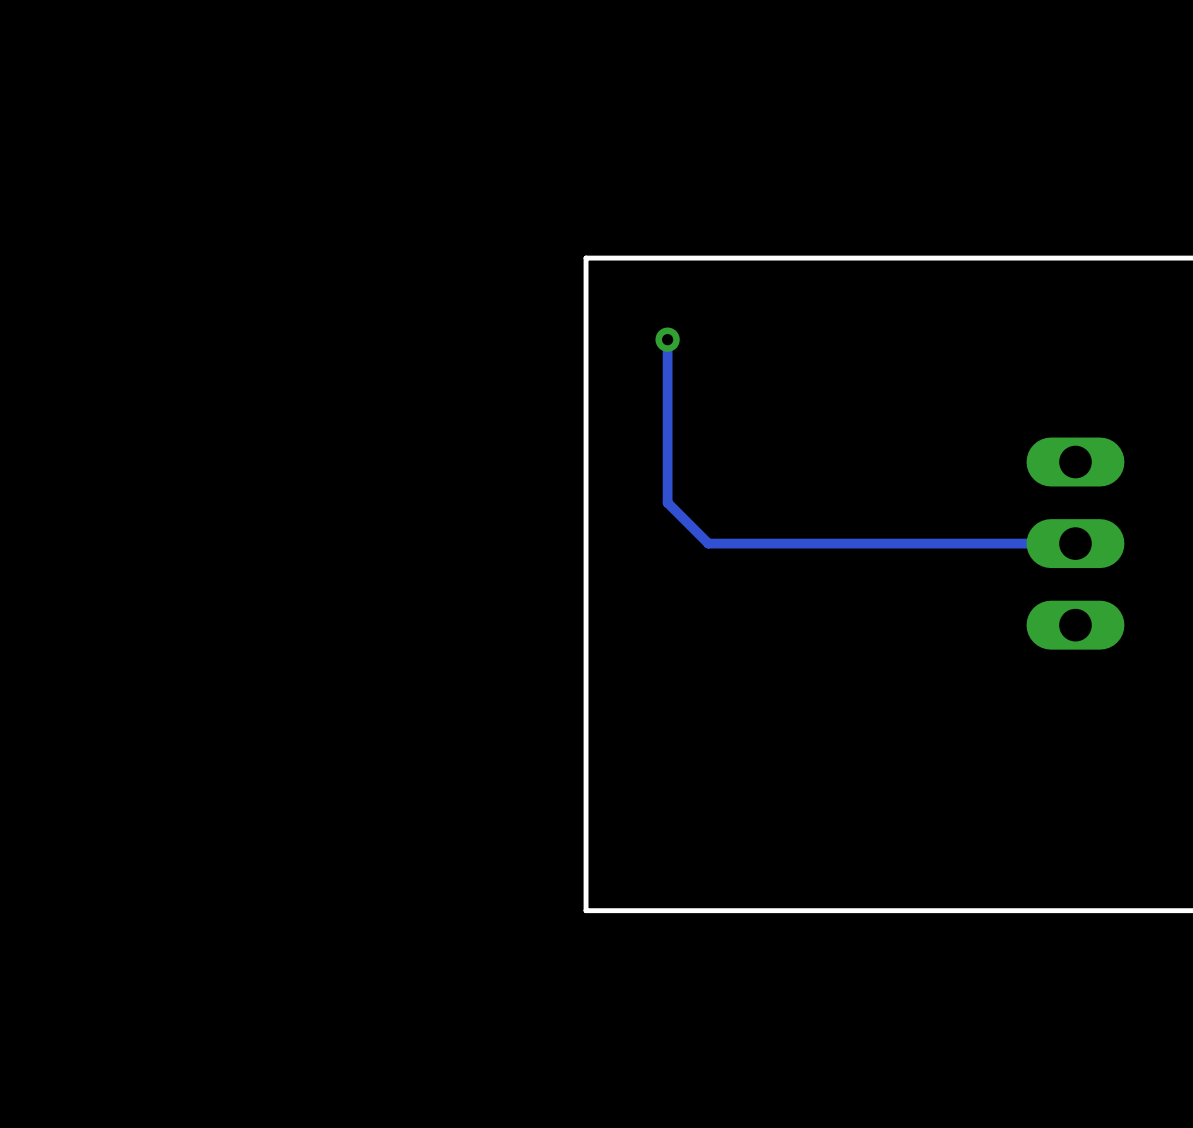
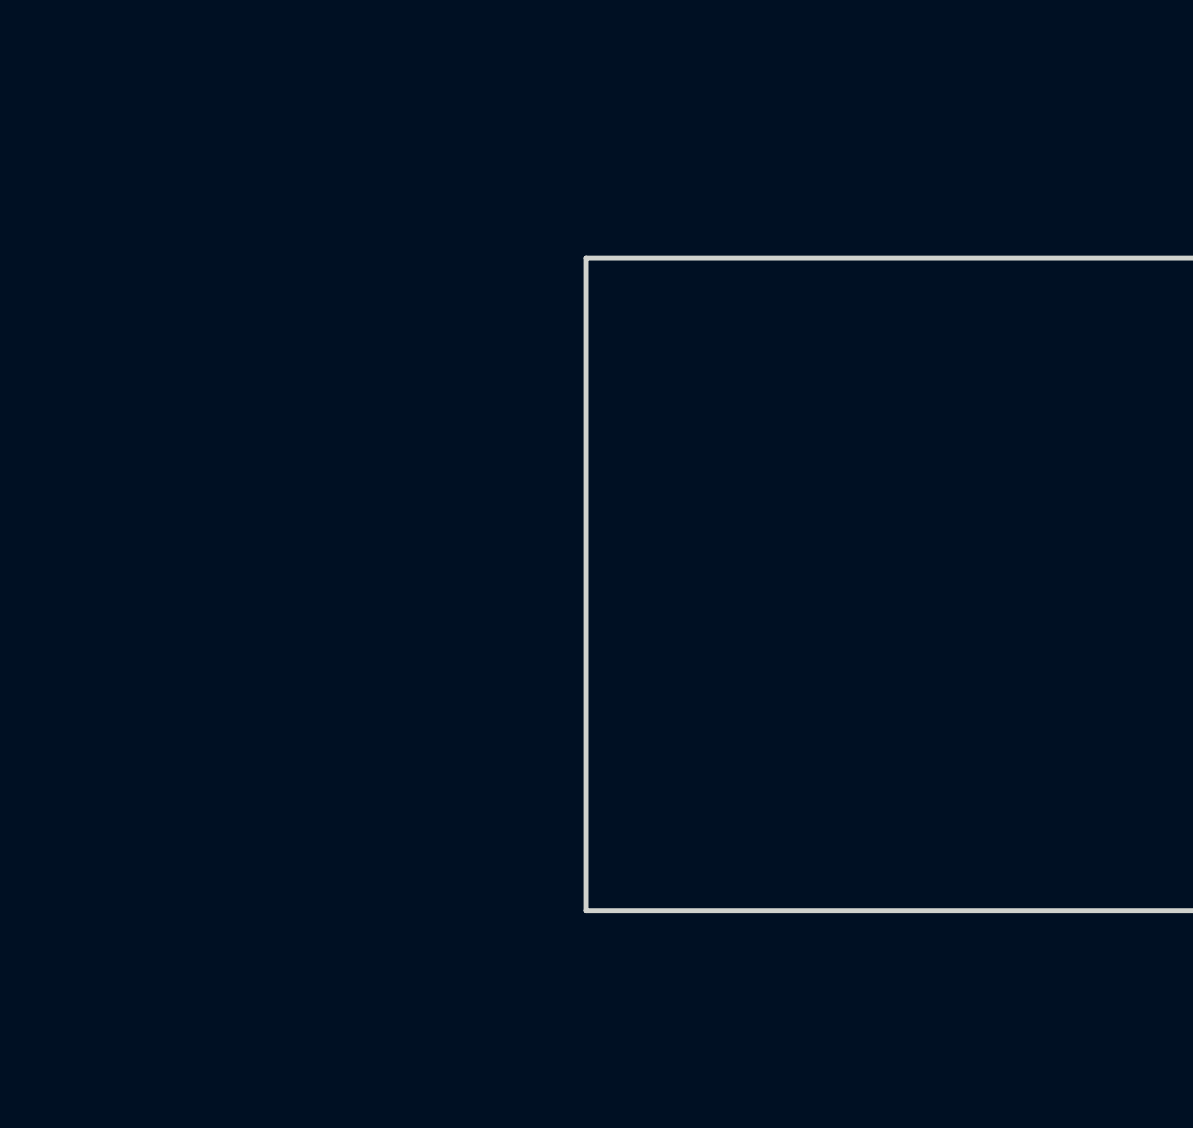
track: (667, 339) (667, 502) (708, 543) (1075, 543) -> none
via: (667, 339) -> none
part: (1075, 543) -> none

